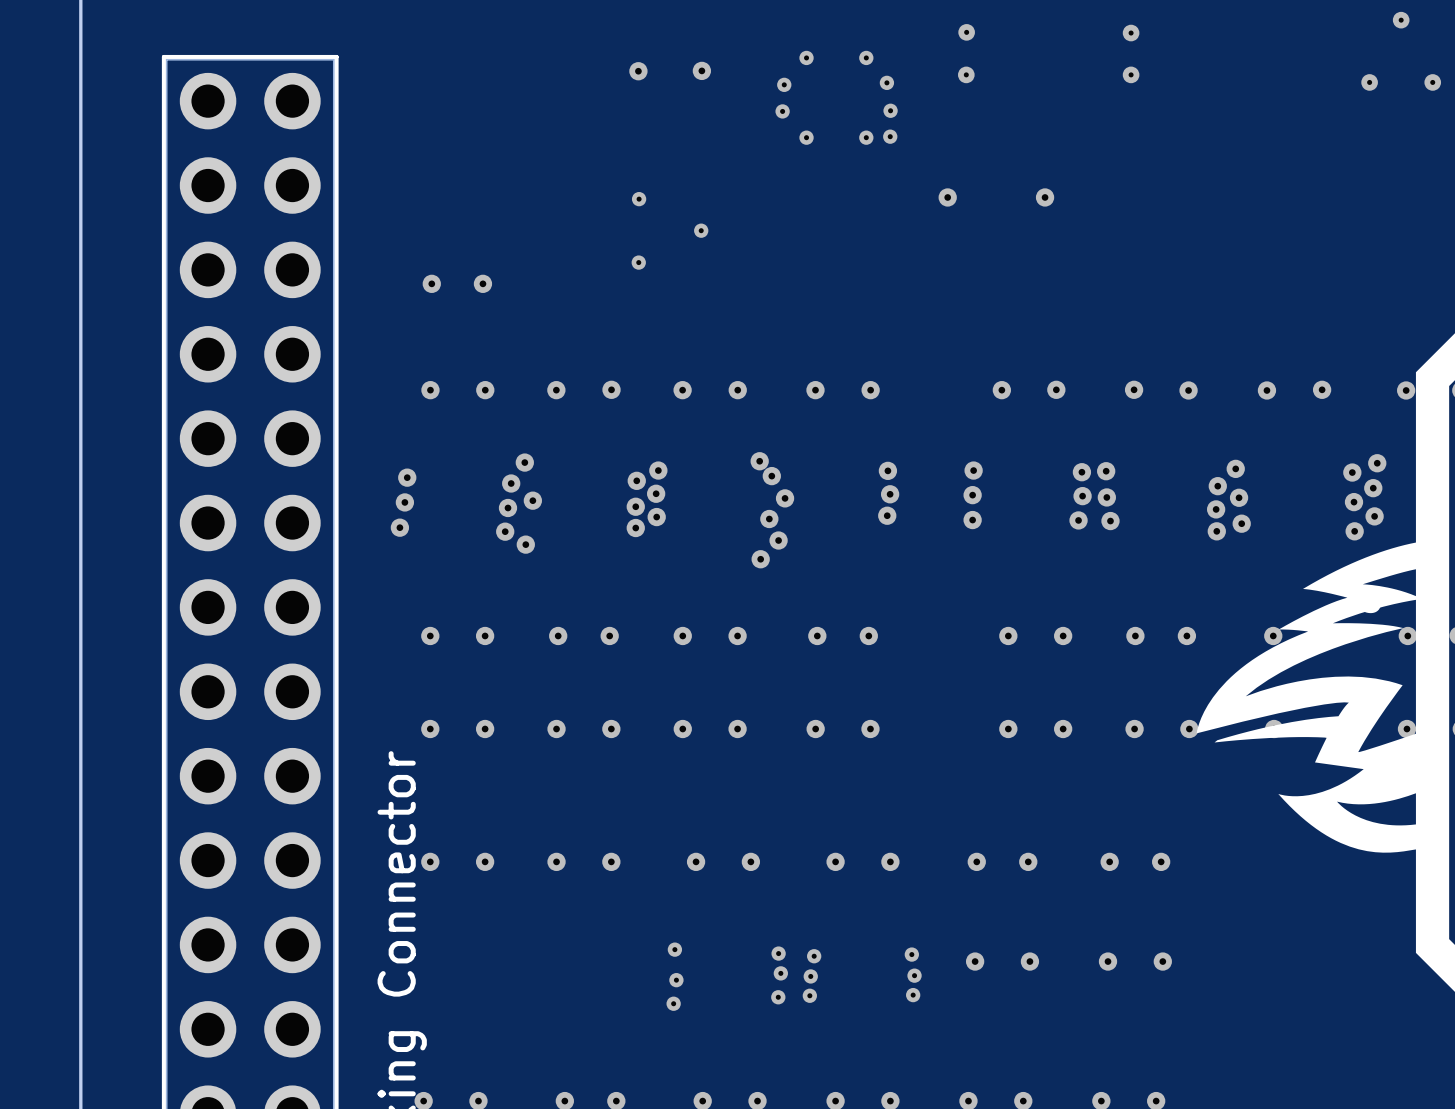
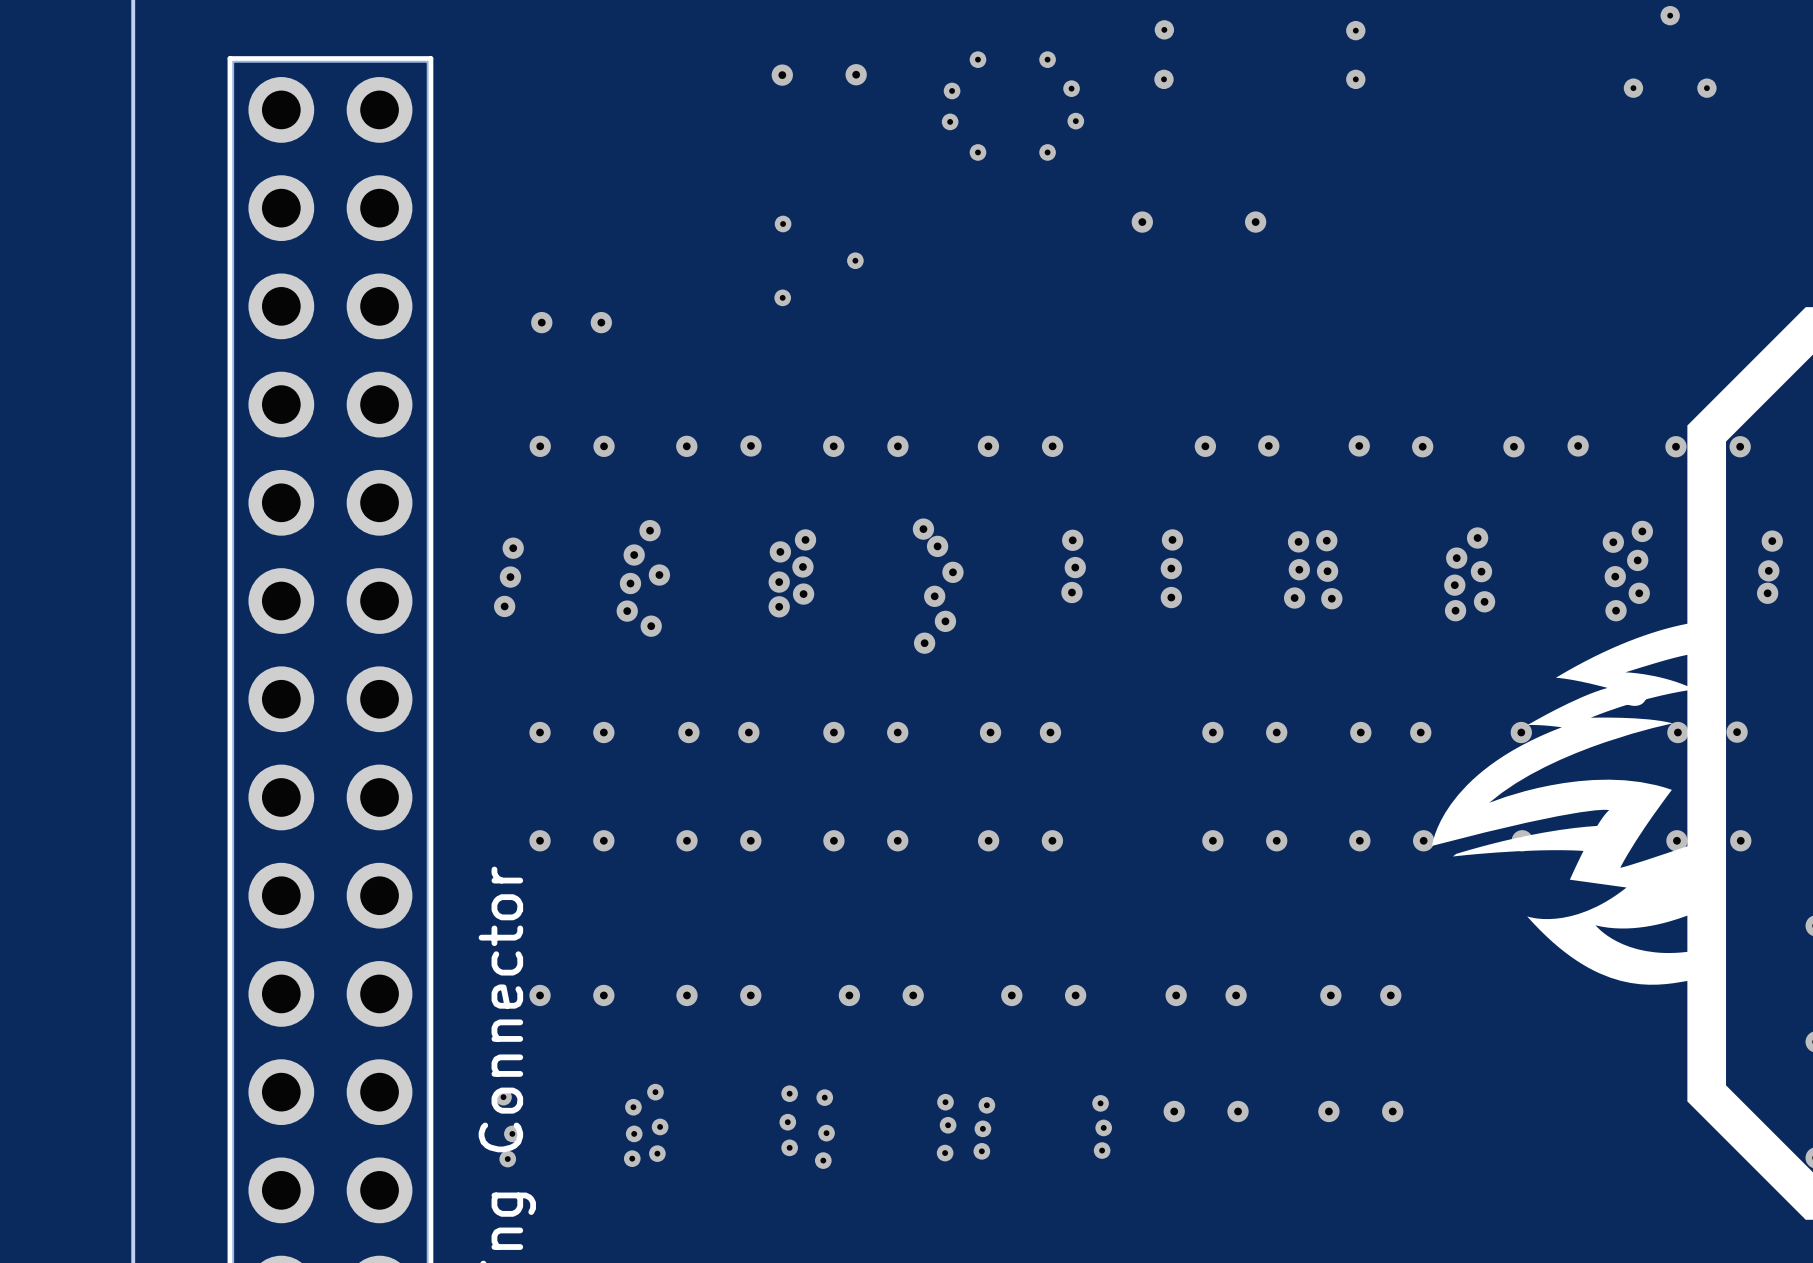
via: (890, 136) -> none
via: none -> (655, 1092)
via: none -> (789, 1093)
via: none -> (503, 1097)
via: none -> (633, 1107)
via: none -> (787, 1122)
via: none -> (660, 1126)
via: none -> (512, 1133)
via: none -> (634, 1133)
via: none -> (789, 1147)
via: none -> (657, 1153)
via: none -> (507, 1159)
via: none -> (632, 1158)

